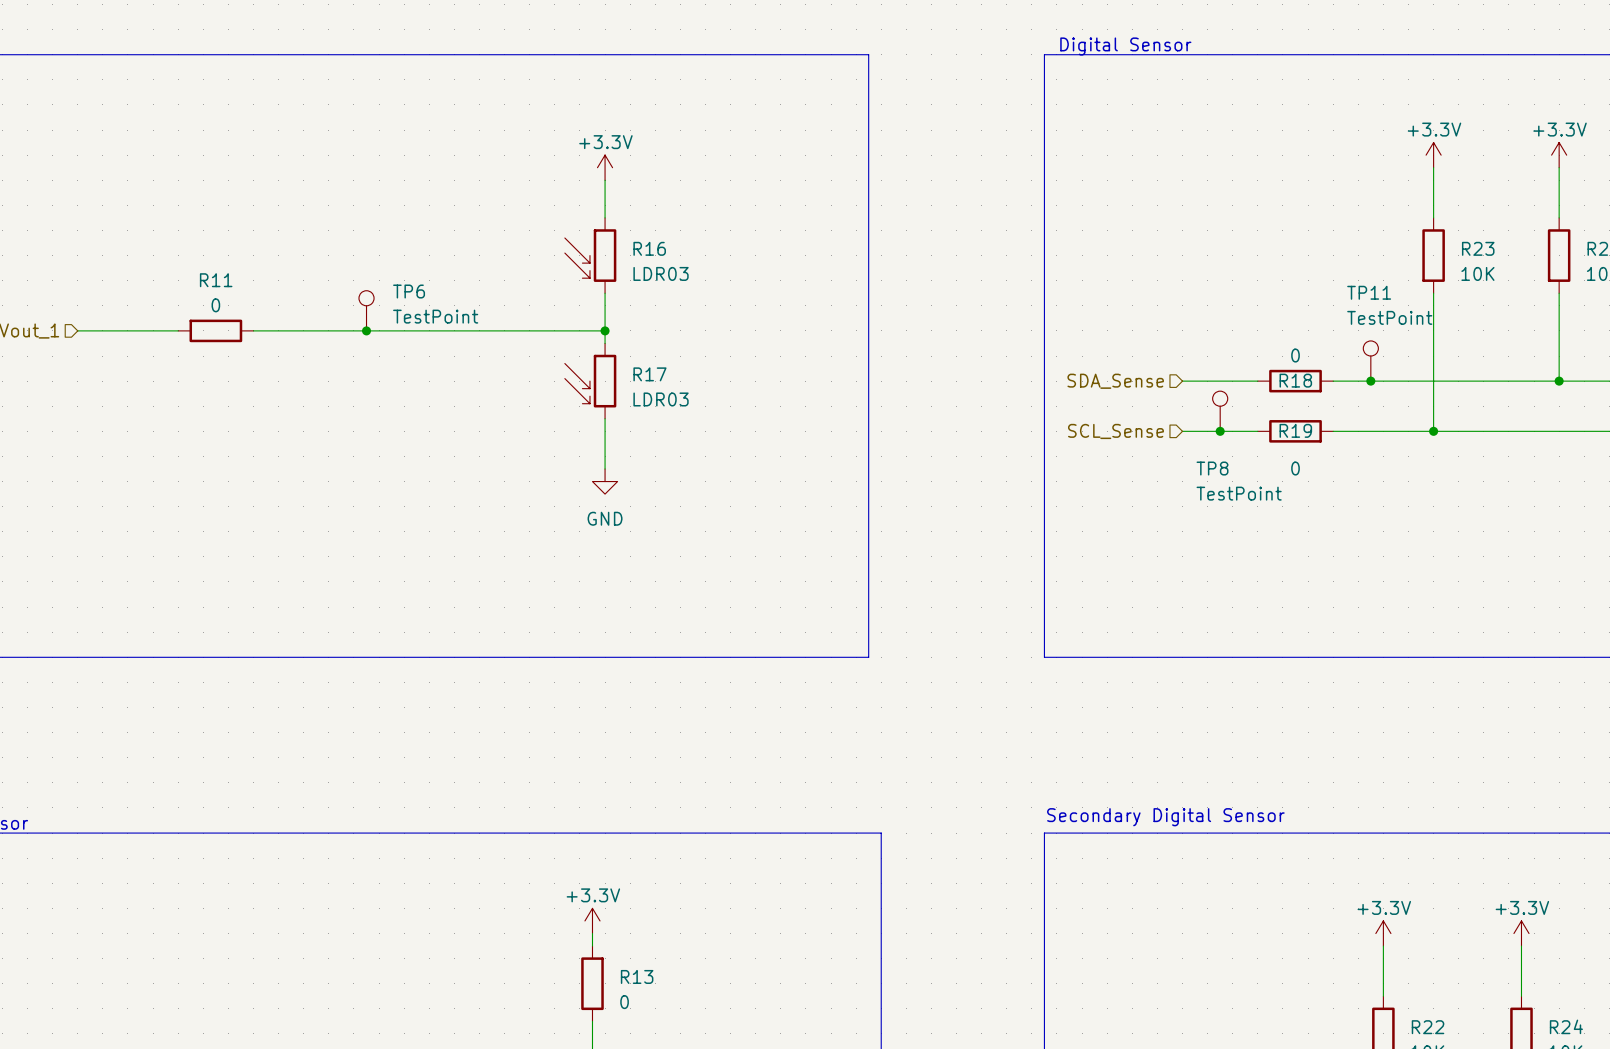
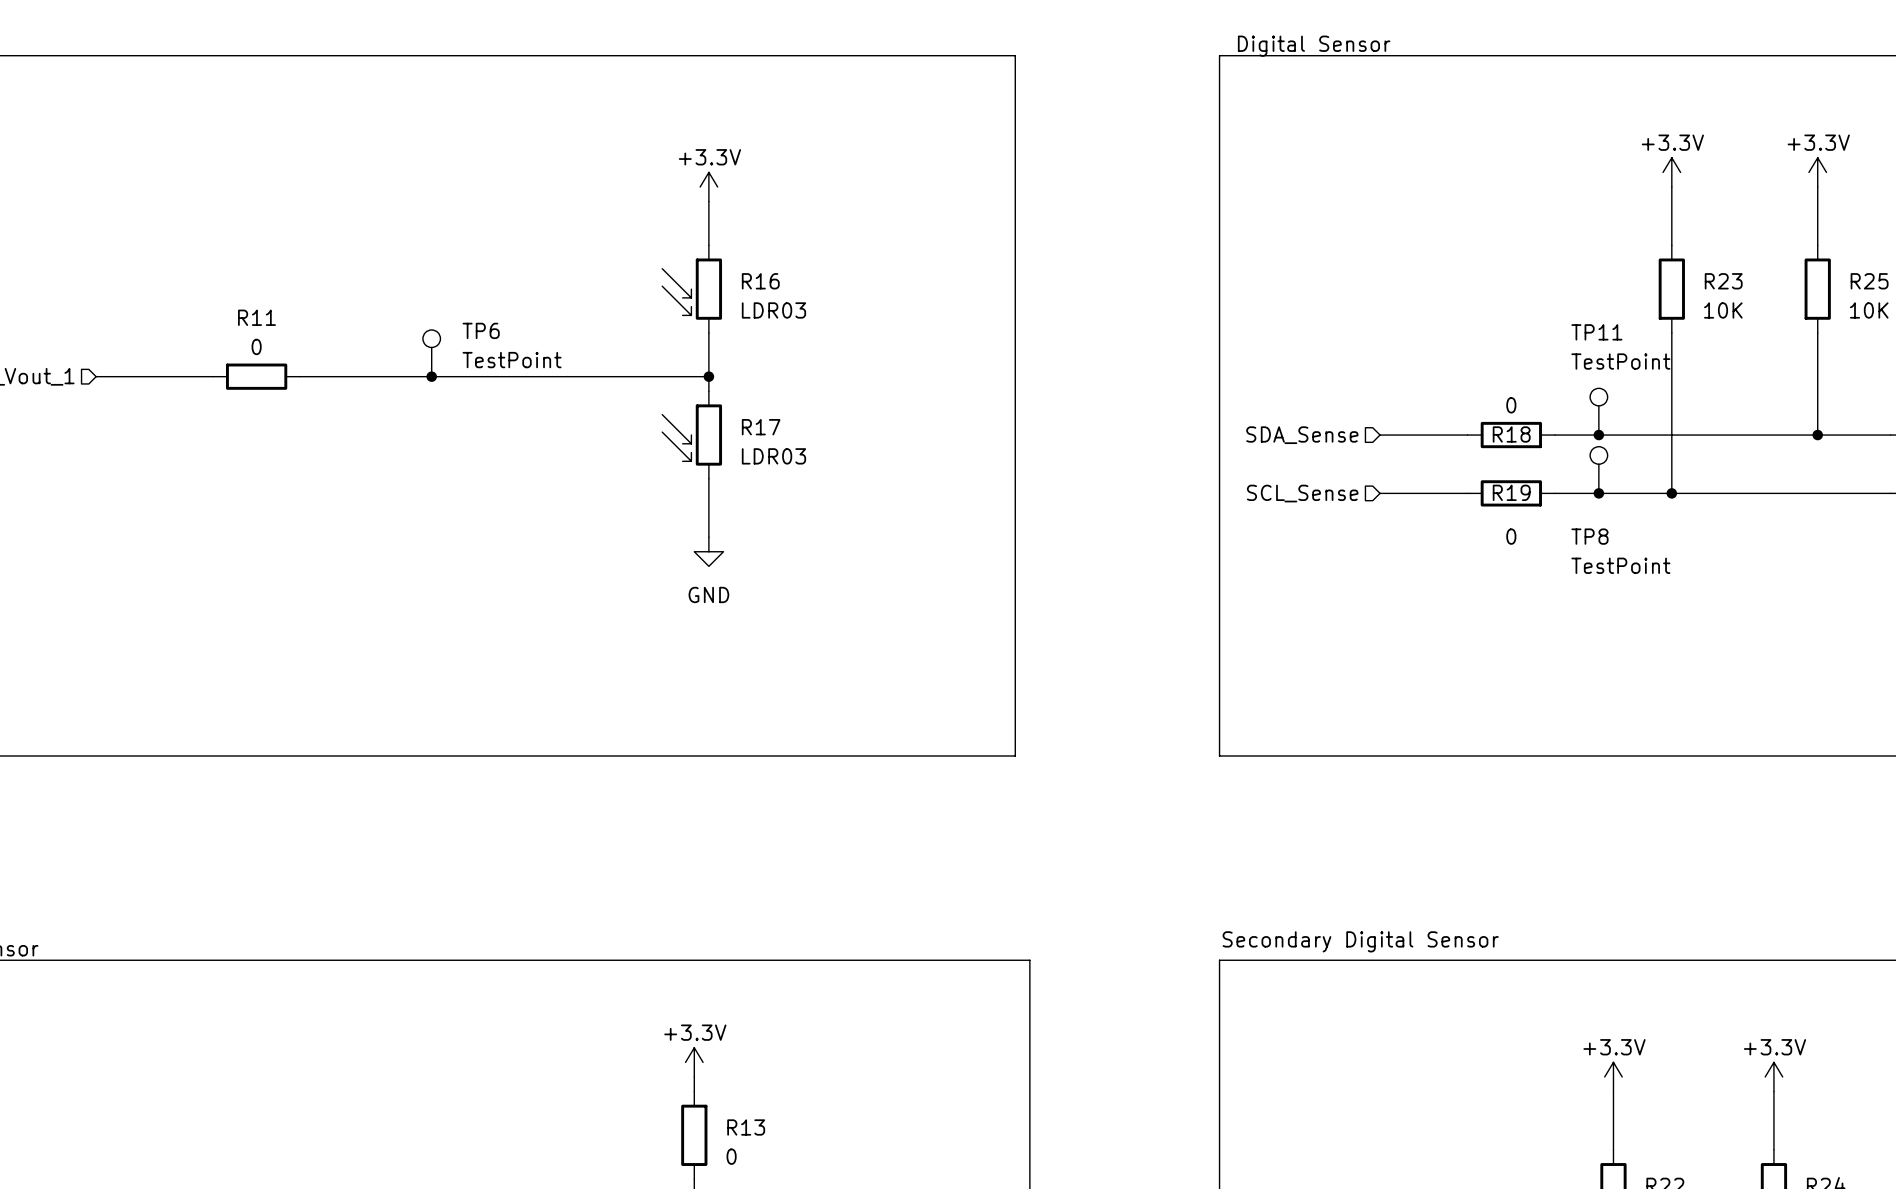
TP8 position: (1220, 411) -> (1598, 470)
junction: (1220, 431) -> none
junction: none -> (1598, 493)

